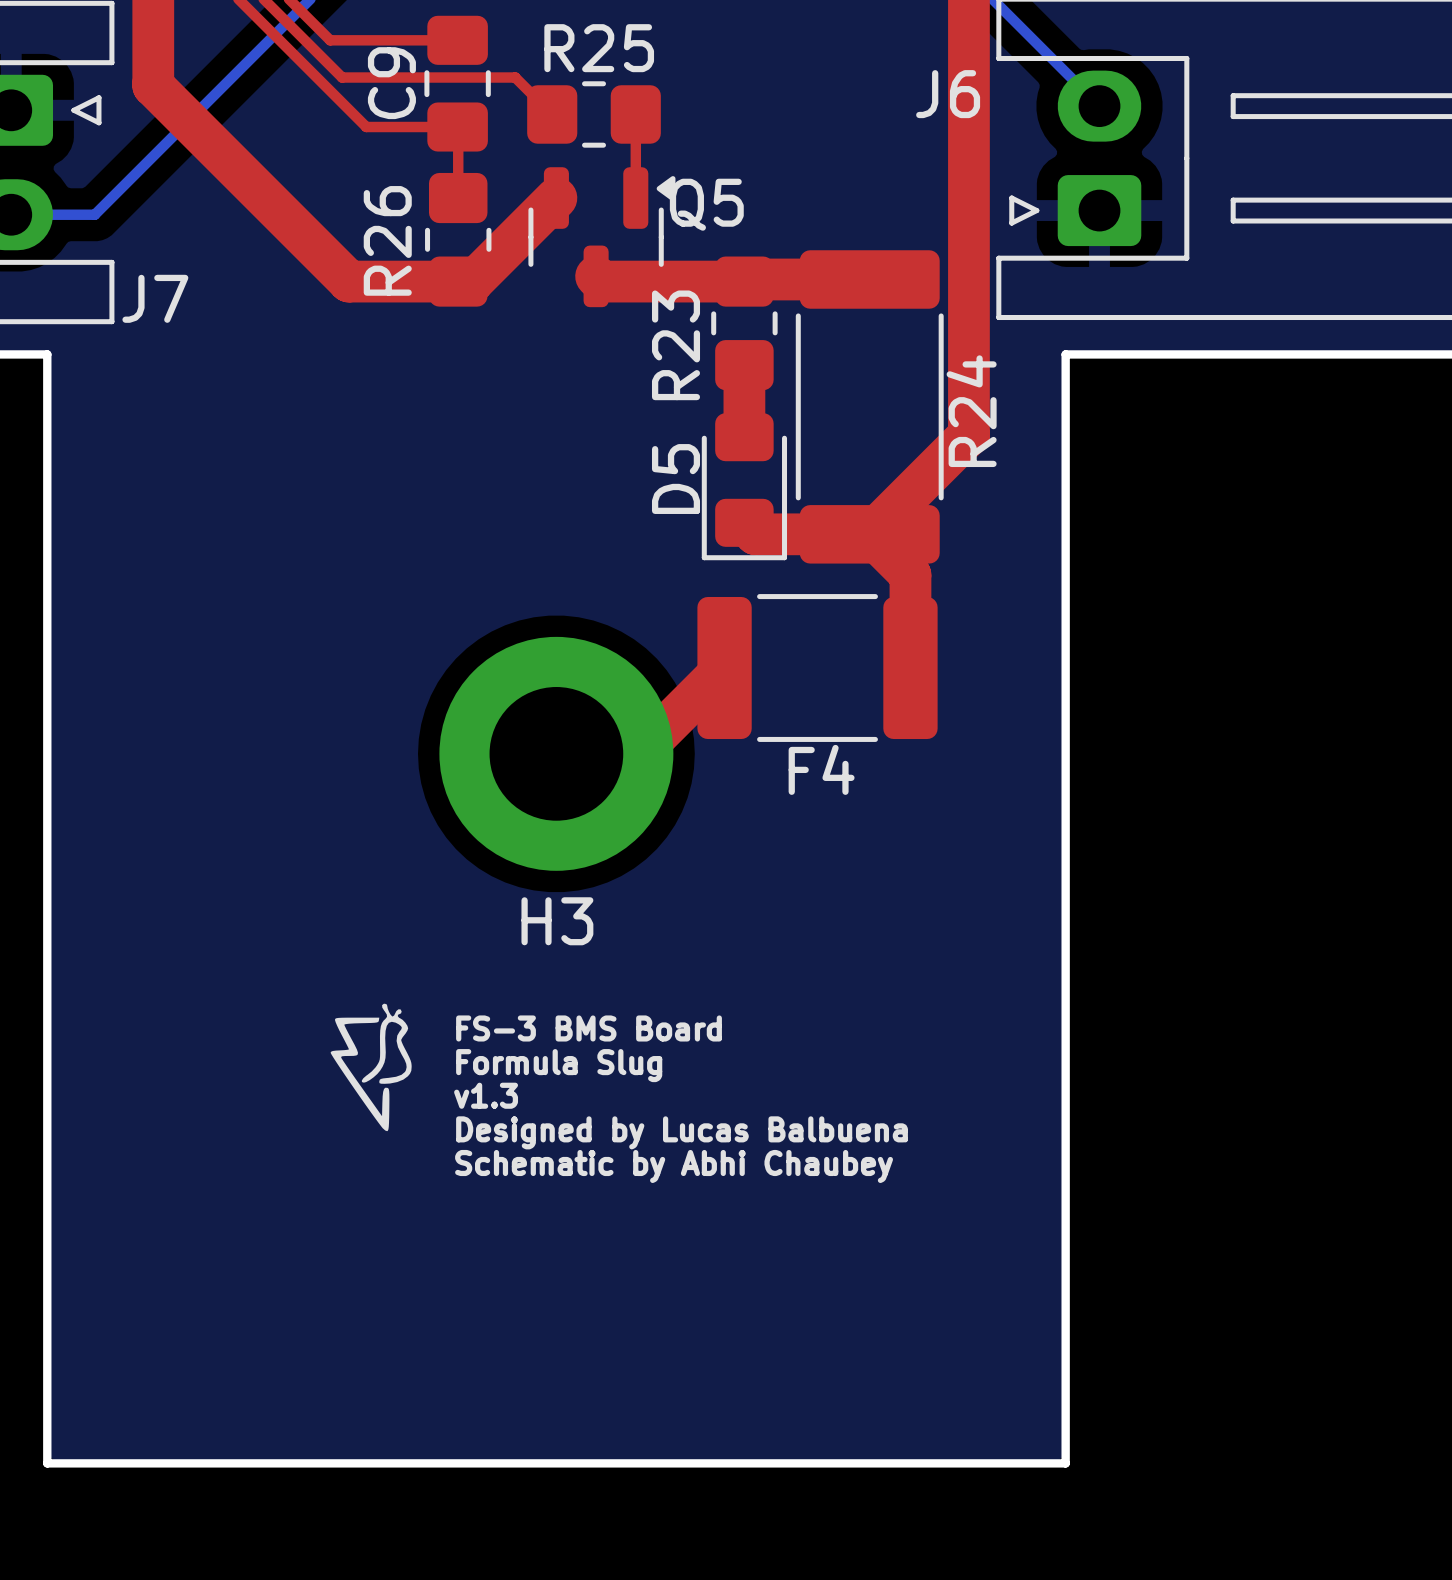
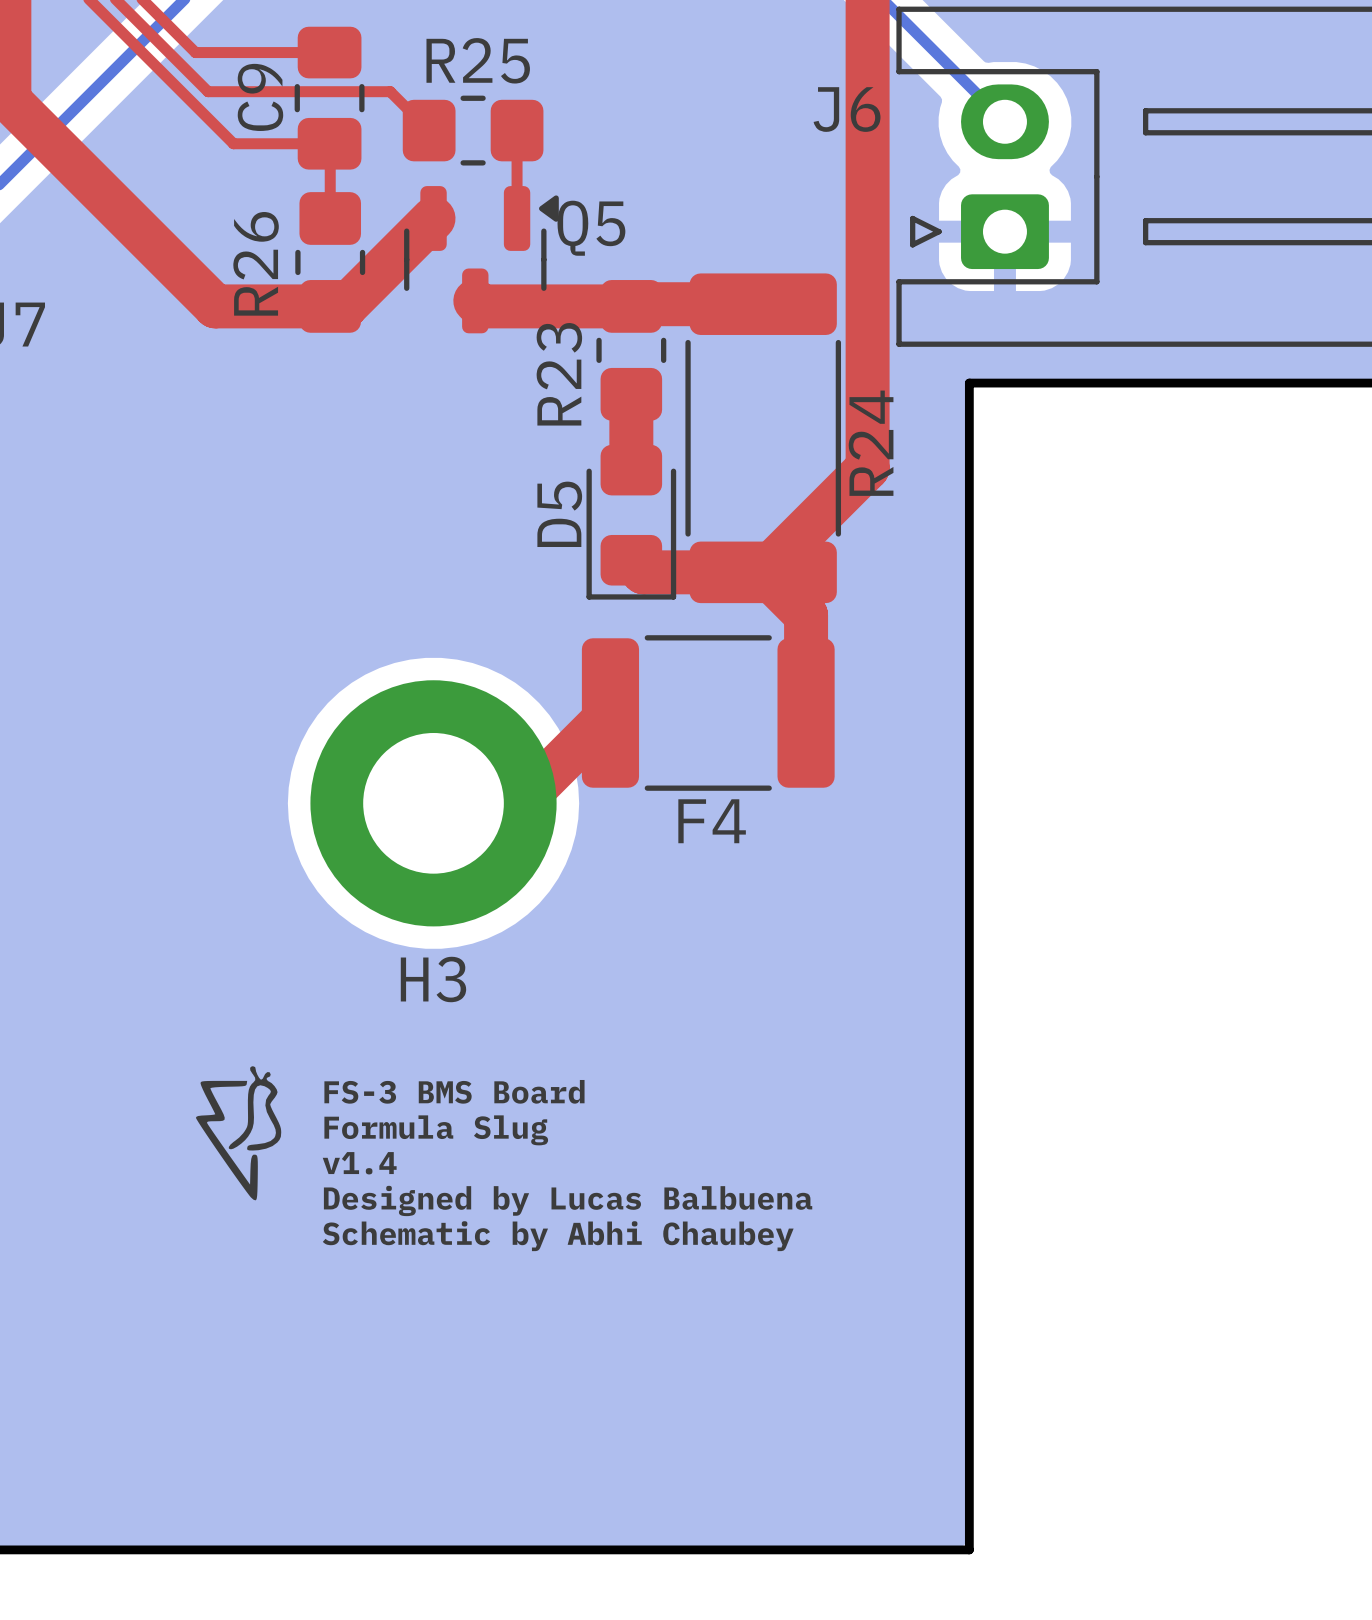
text: v1.3 (486, 1095) -> v1.4 (359, 1163)

